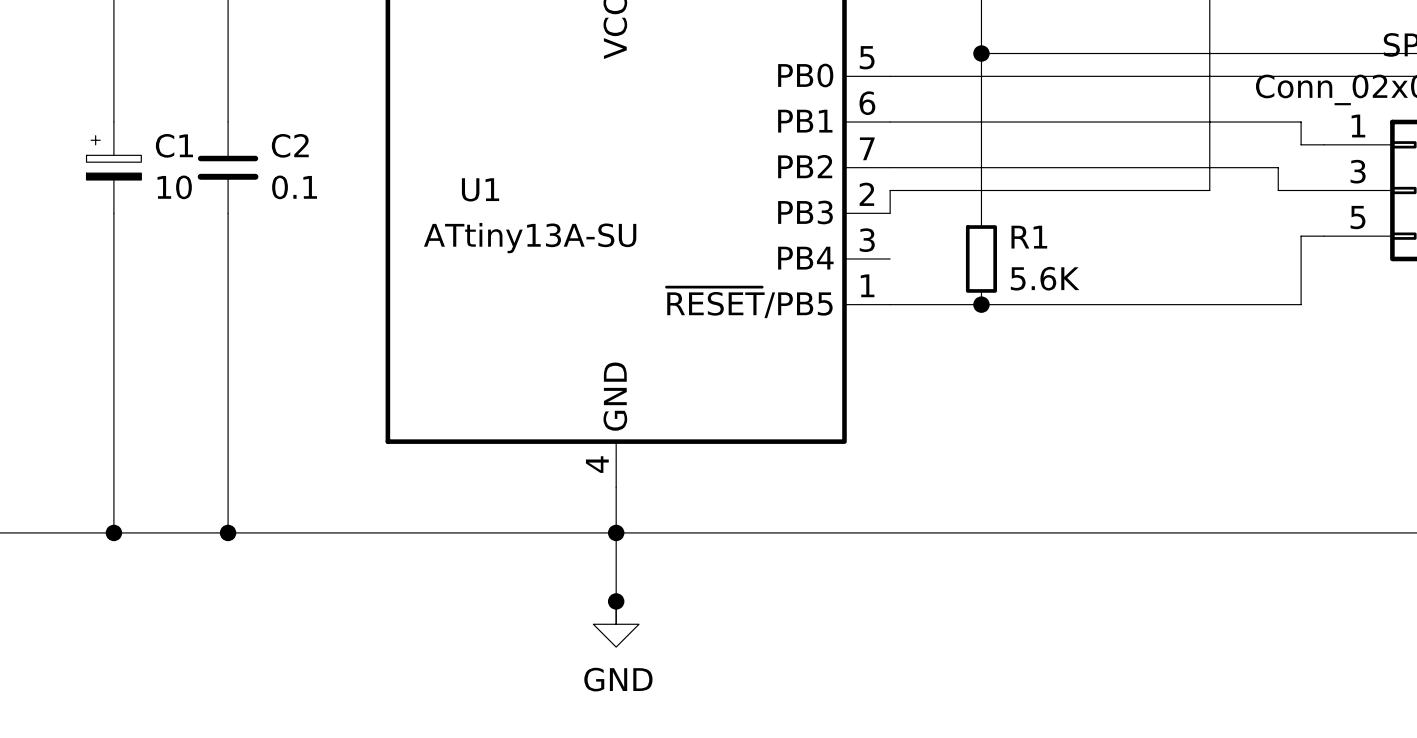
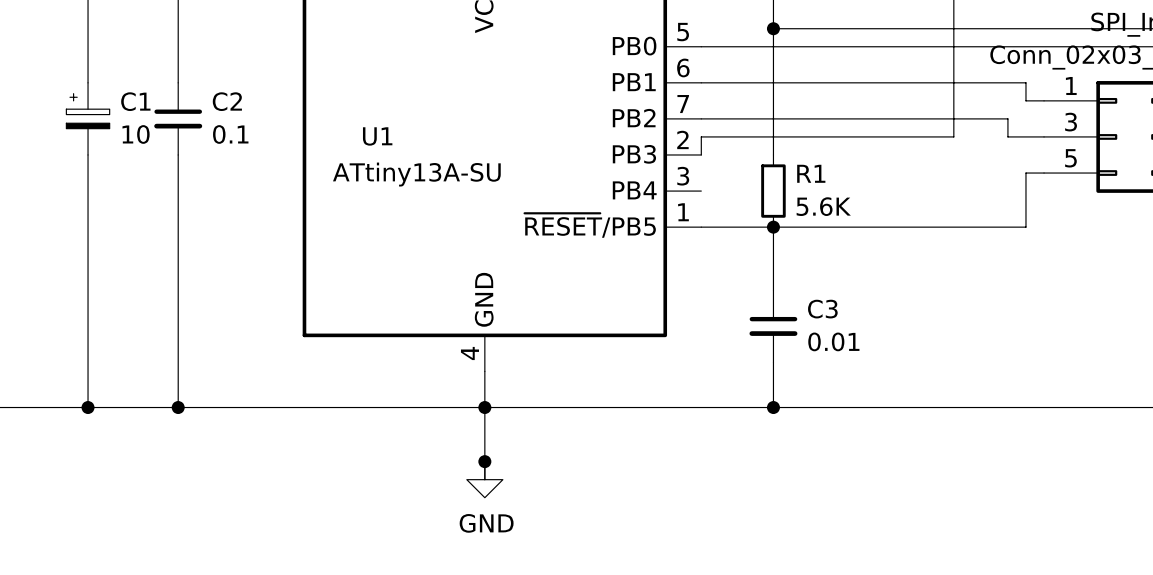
wire: none -> (773, 227) (773, 290)
C3: none -> 0.01 (773, 326)
wire: none -> (773, 362) (773, 407)
junction: none -> (773, 407)

